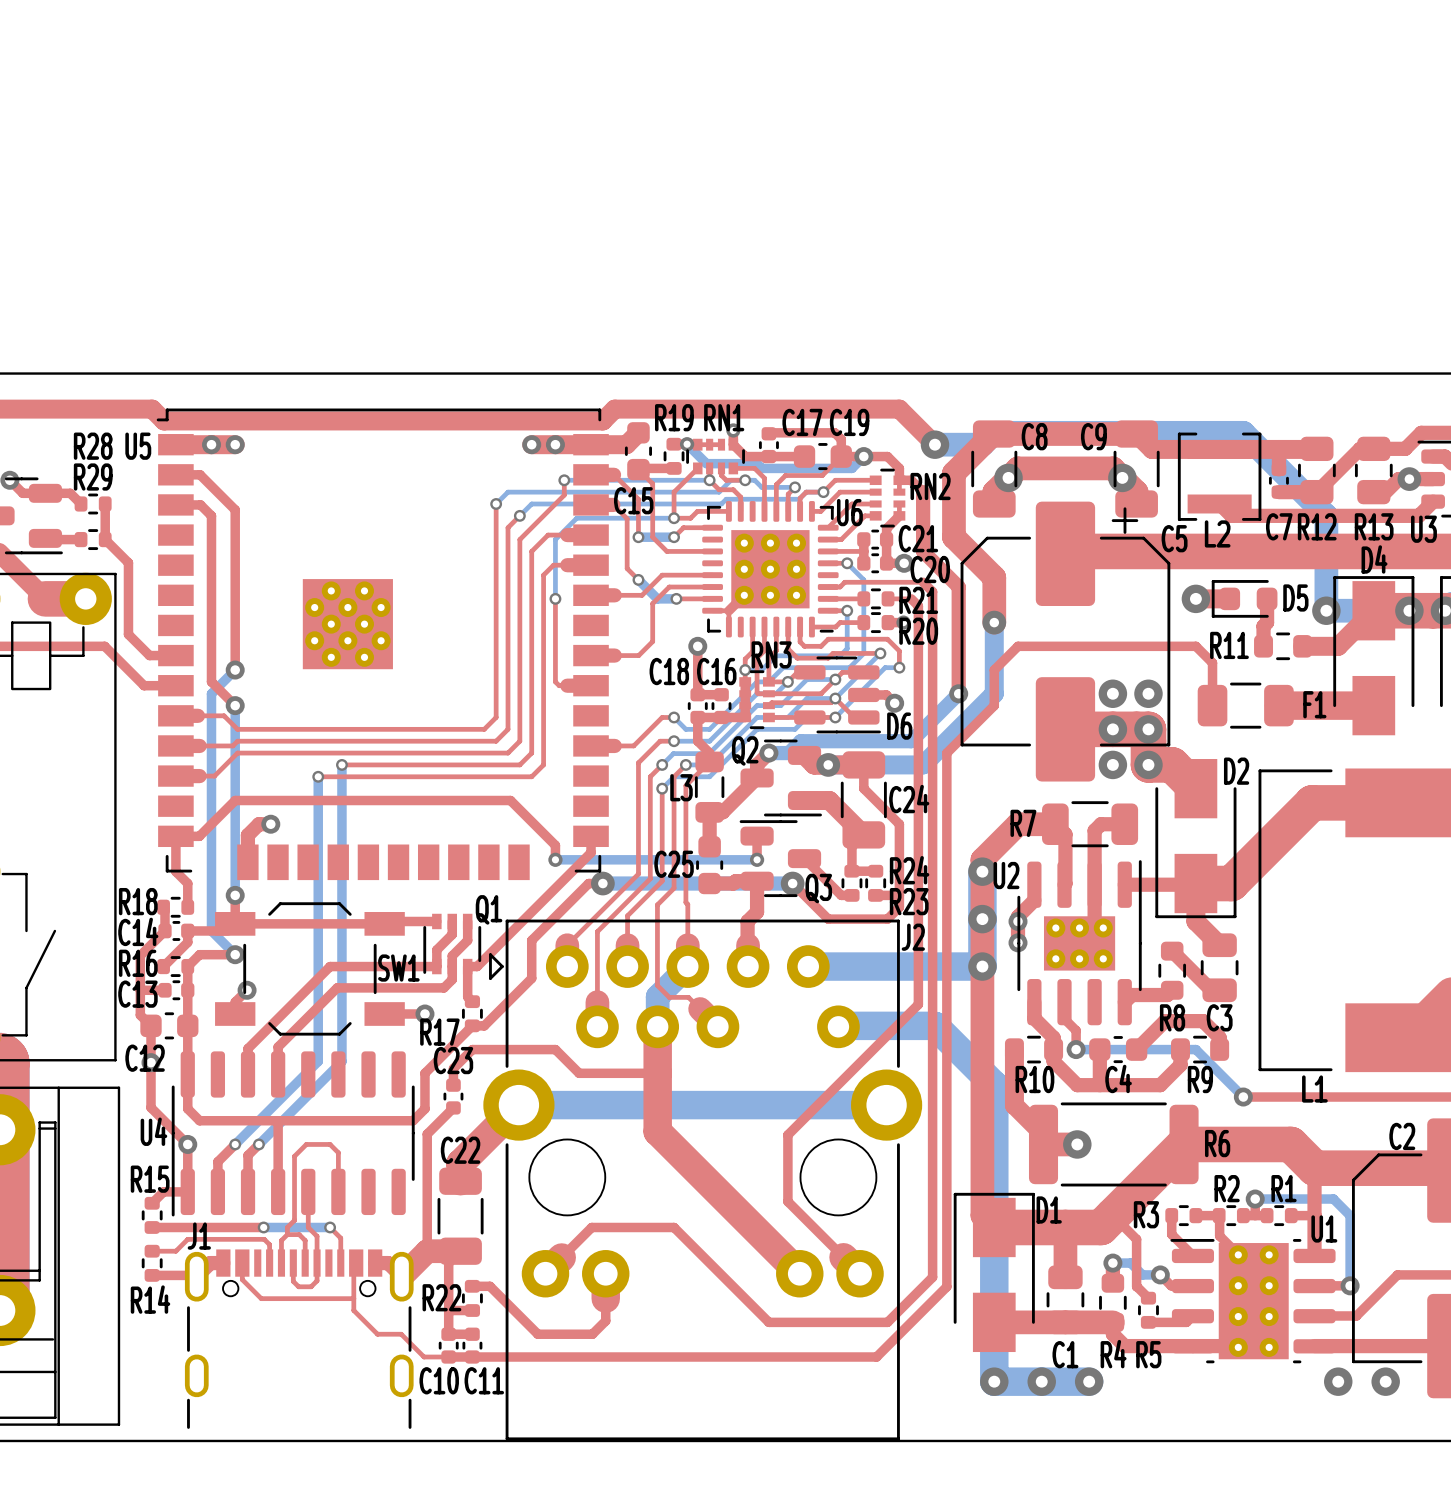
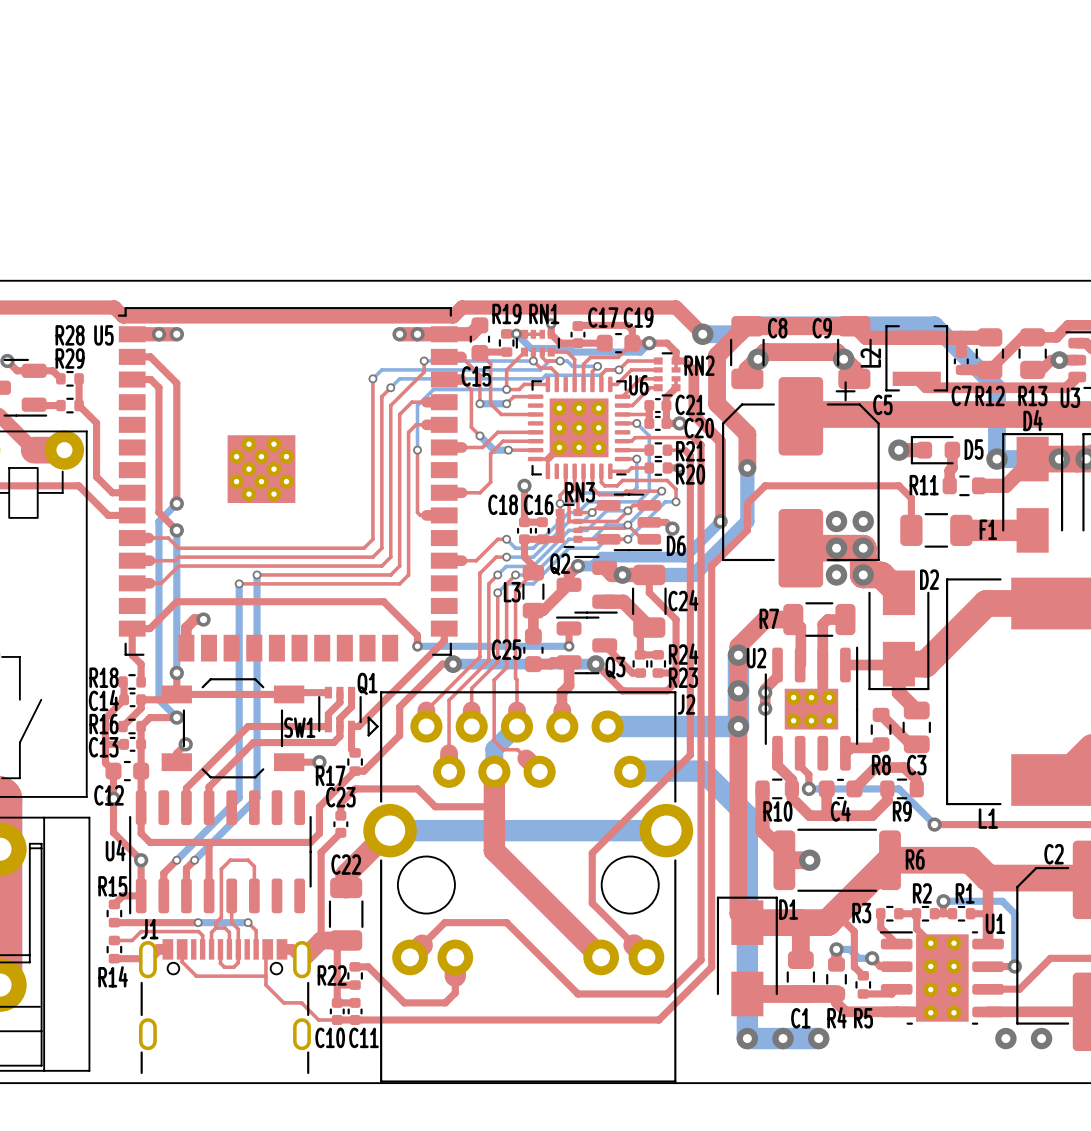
L2 name rotation: 0° (1217, 533) -> 90° counterclockwise (870, 358)
L2 name position: L2 (1217, 533) -> L2 (870, 358)

